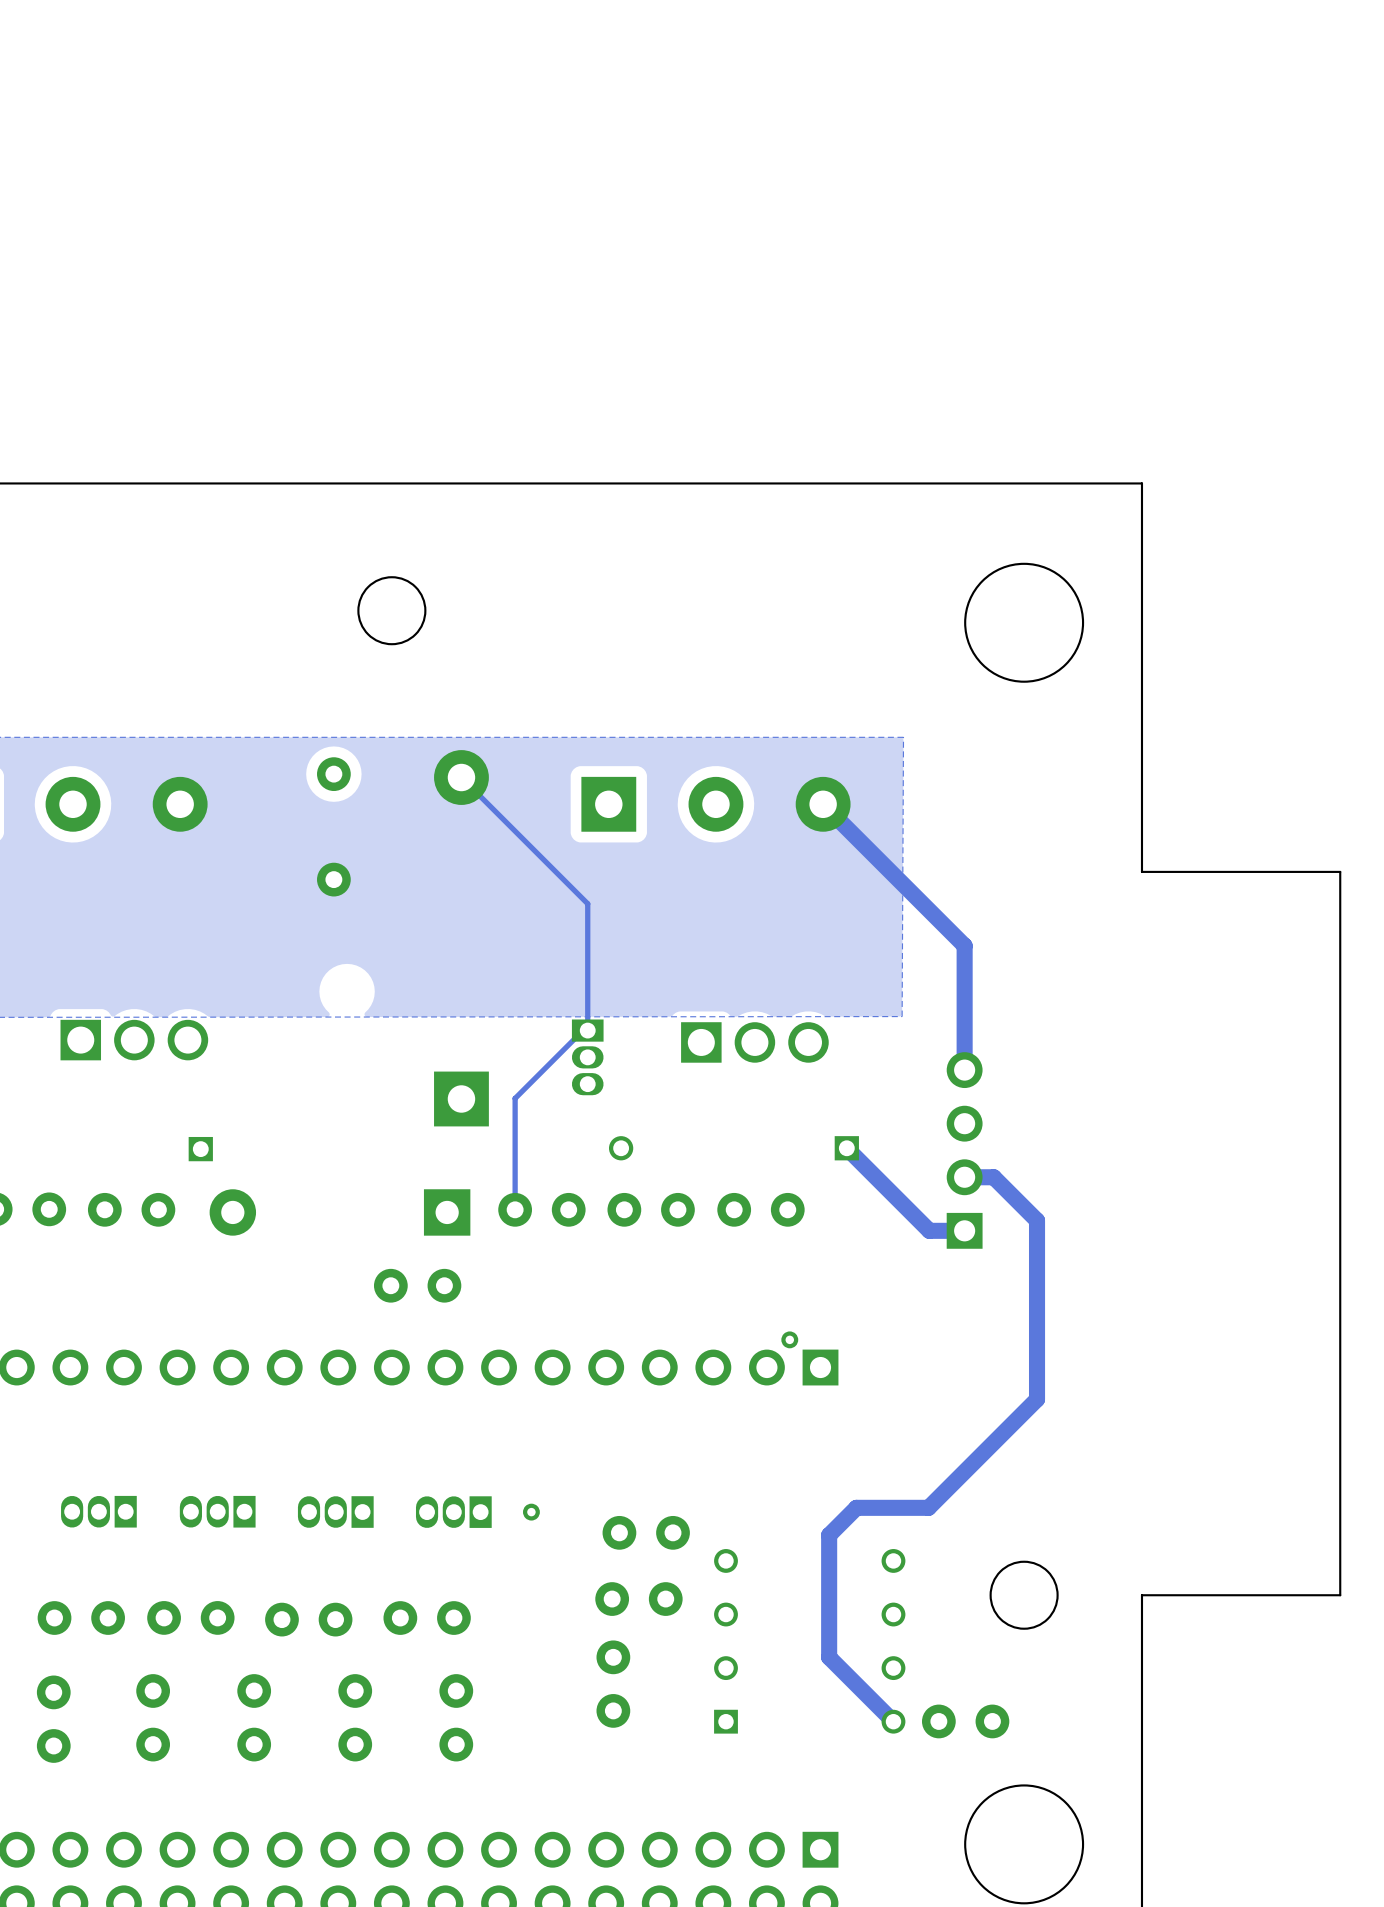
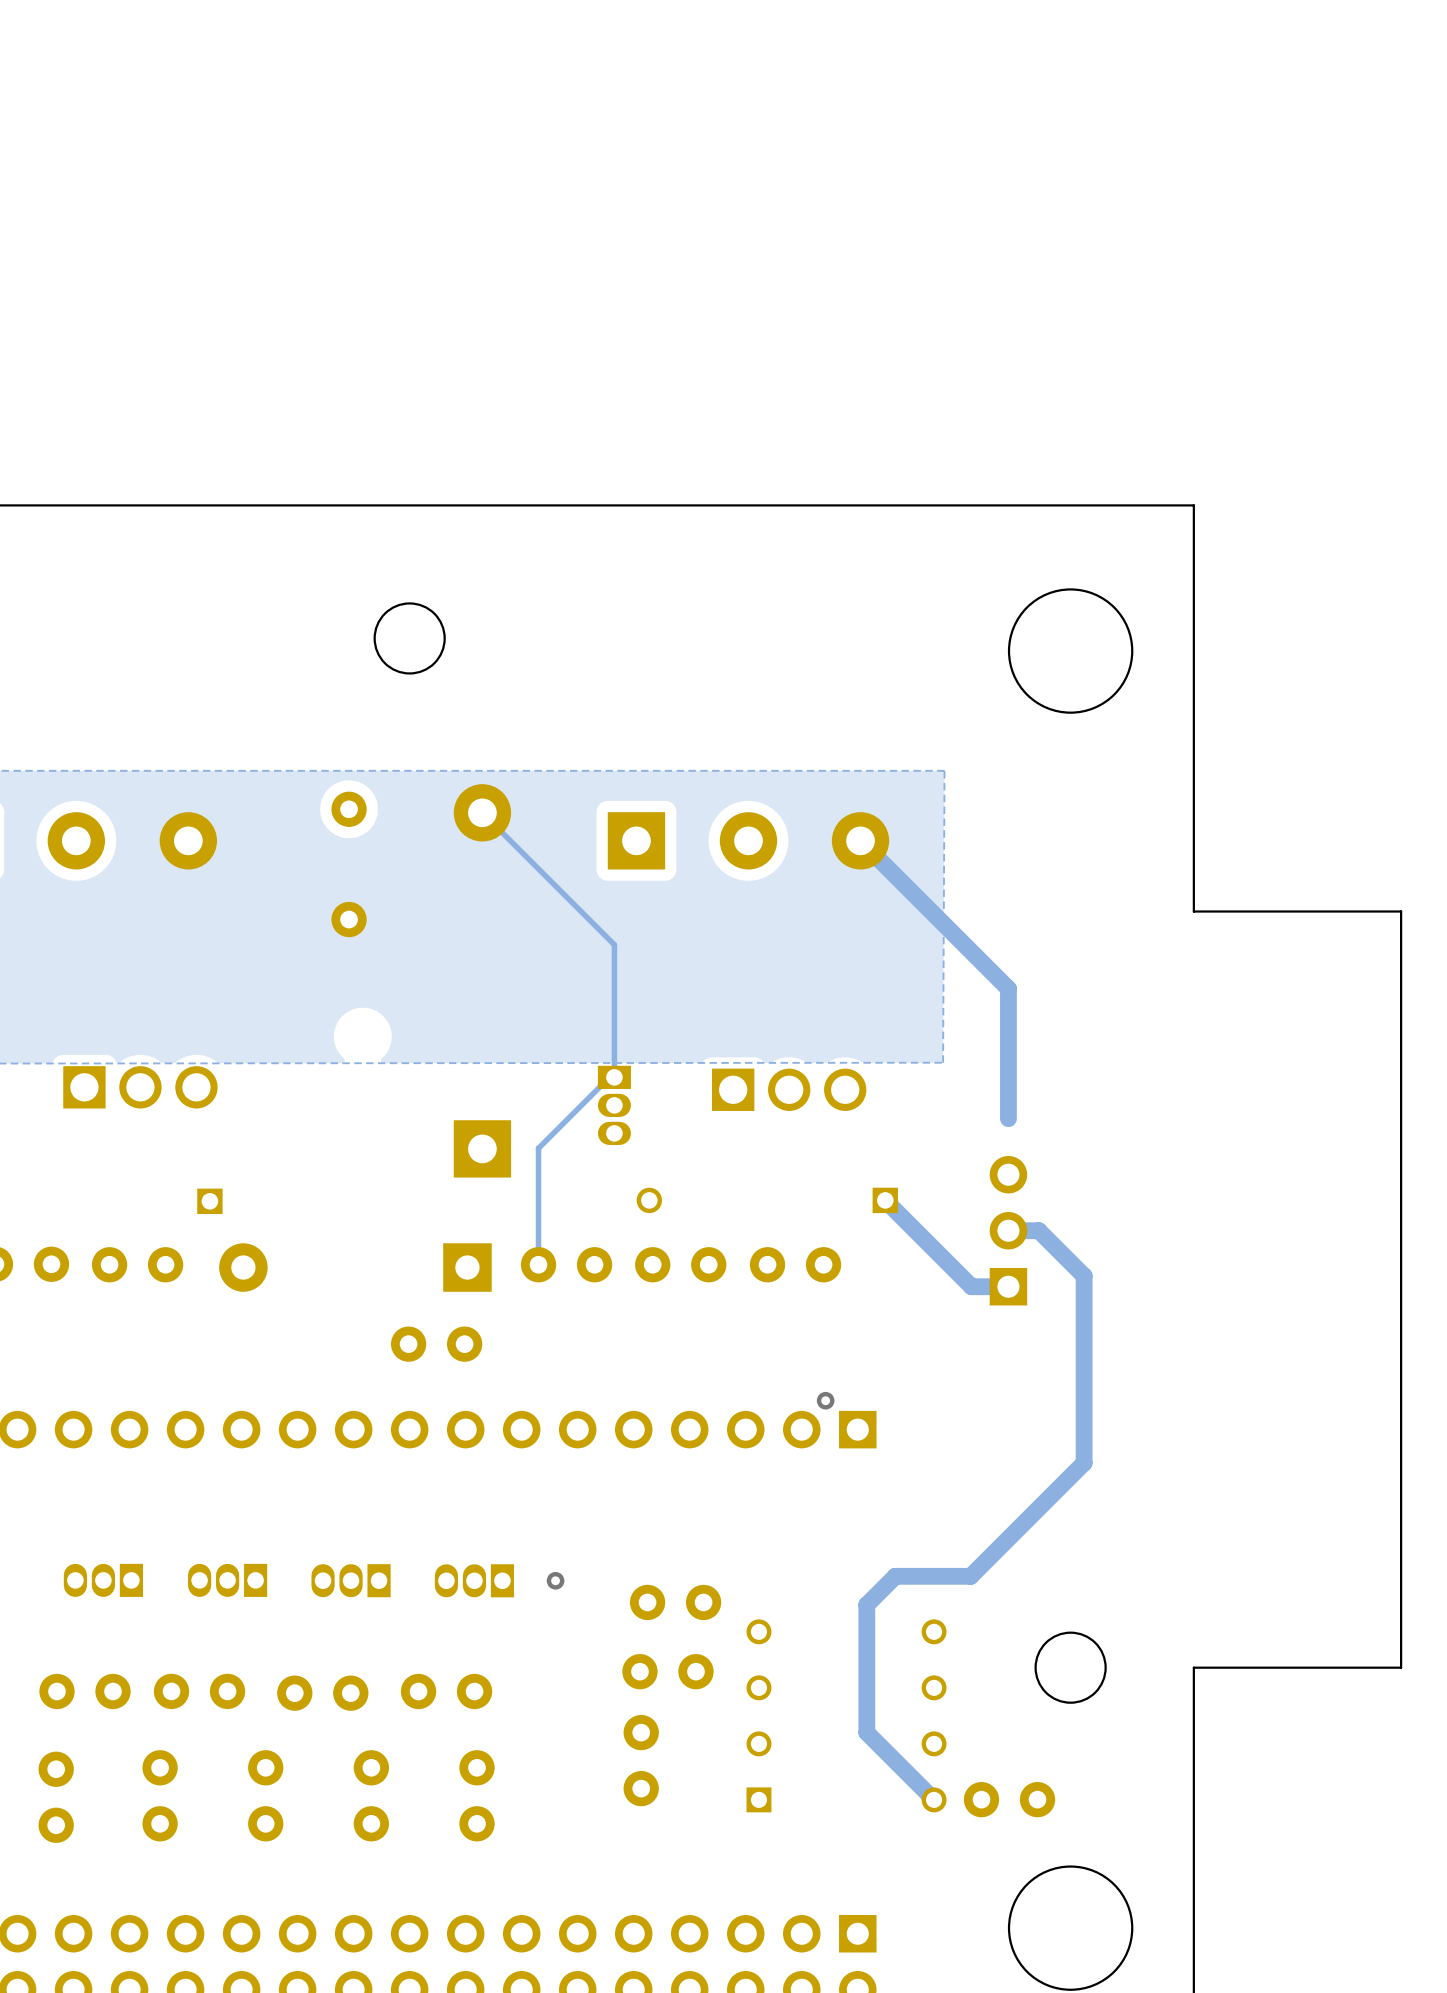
part: (964, 1150) -> none

